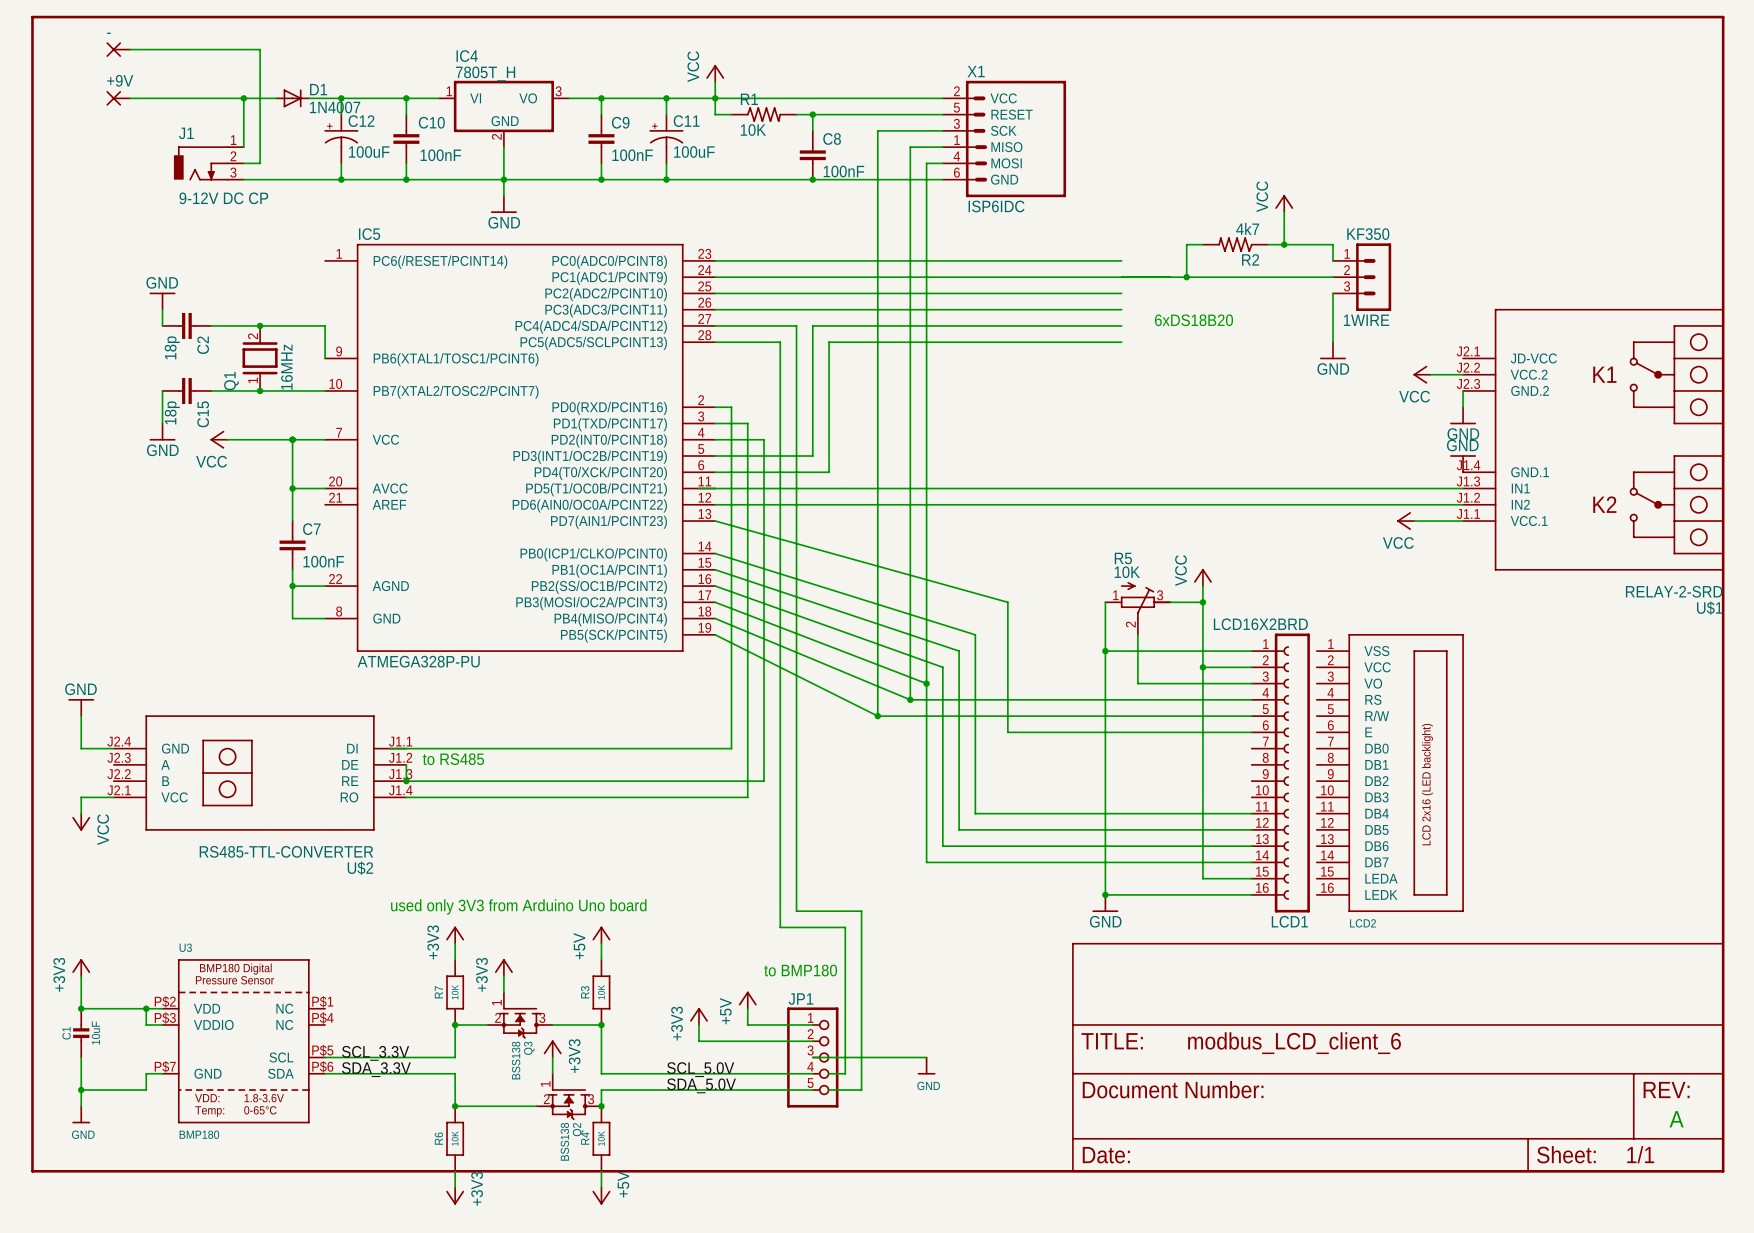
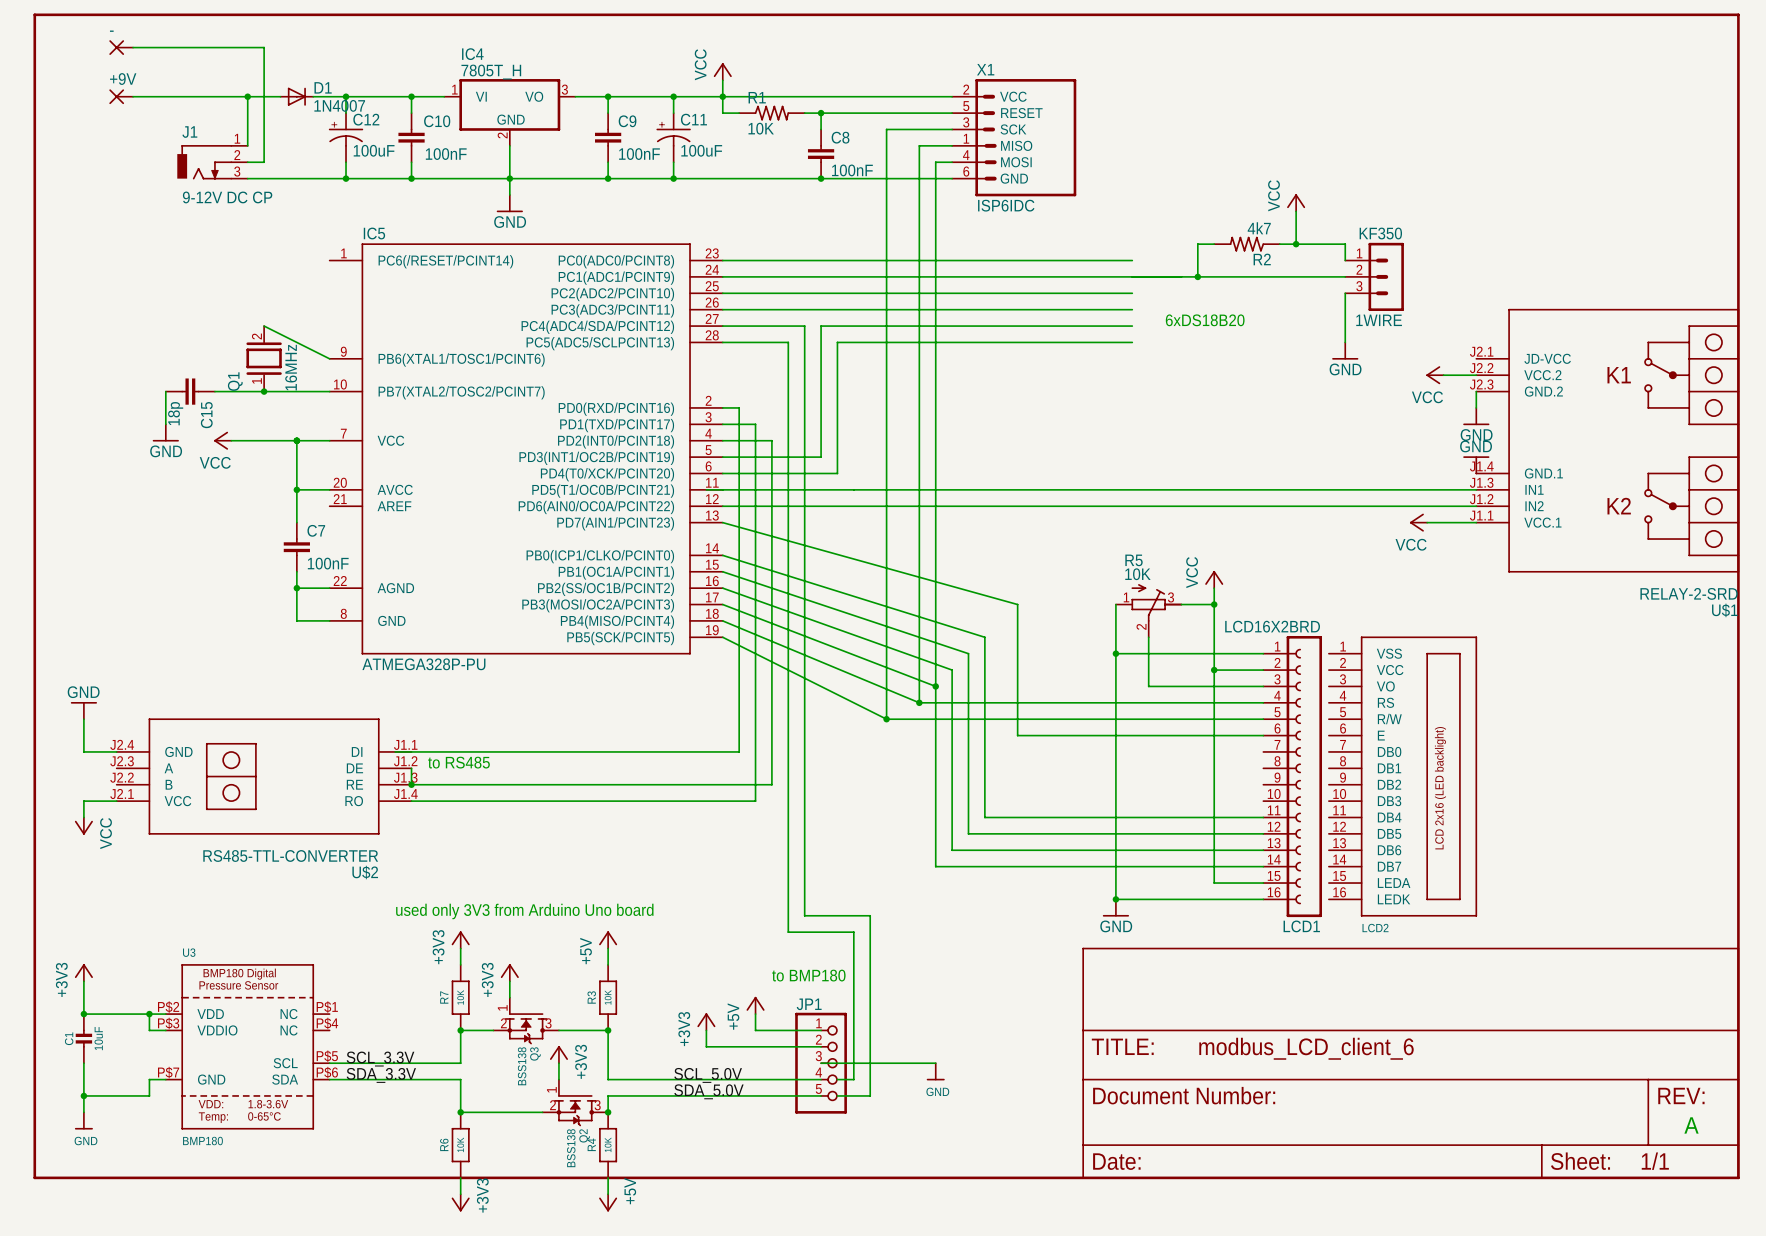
power symbol: GND (162, 301) -> none
wire: (162, 309) (162, 325) -> none
C2: 18p (186, 325) -> none
wire: (211, 325) (325, 325) (325, 358) -> (264, 326) (329, 358)
junction: (260, 325) -> none

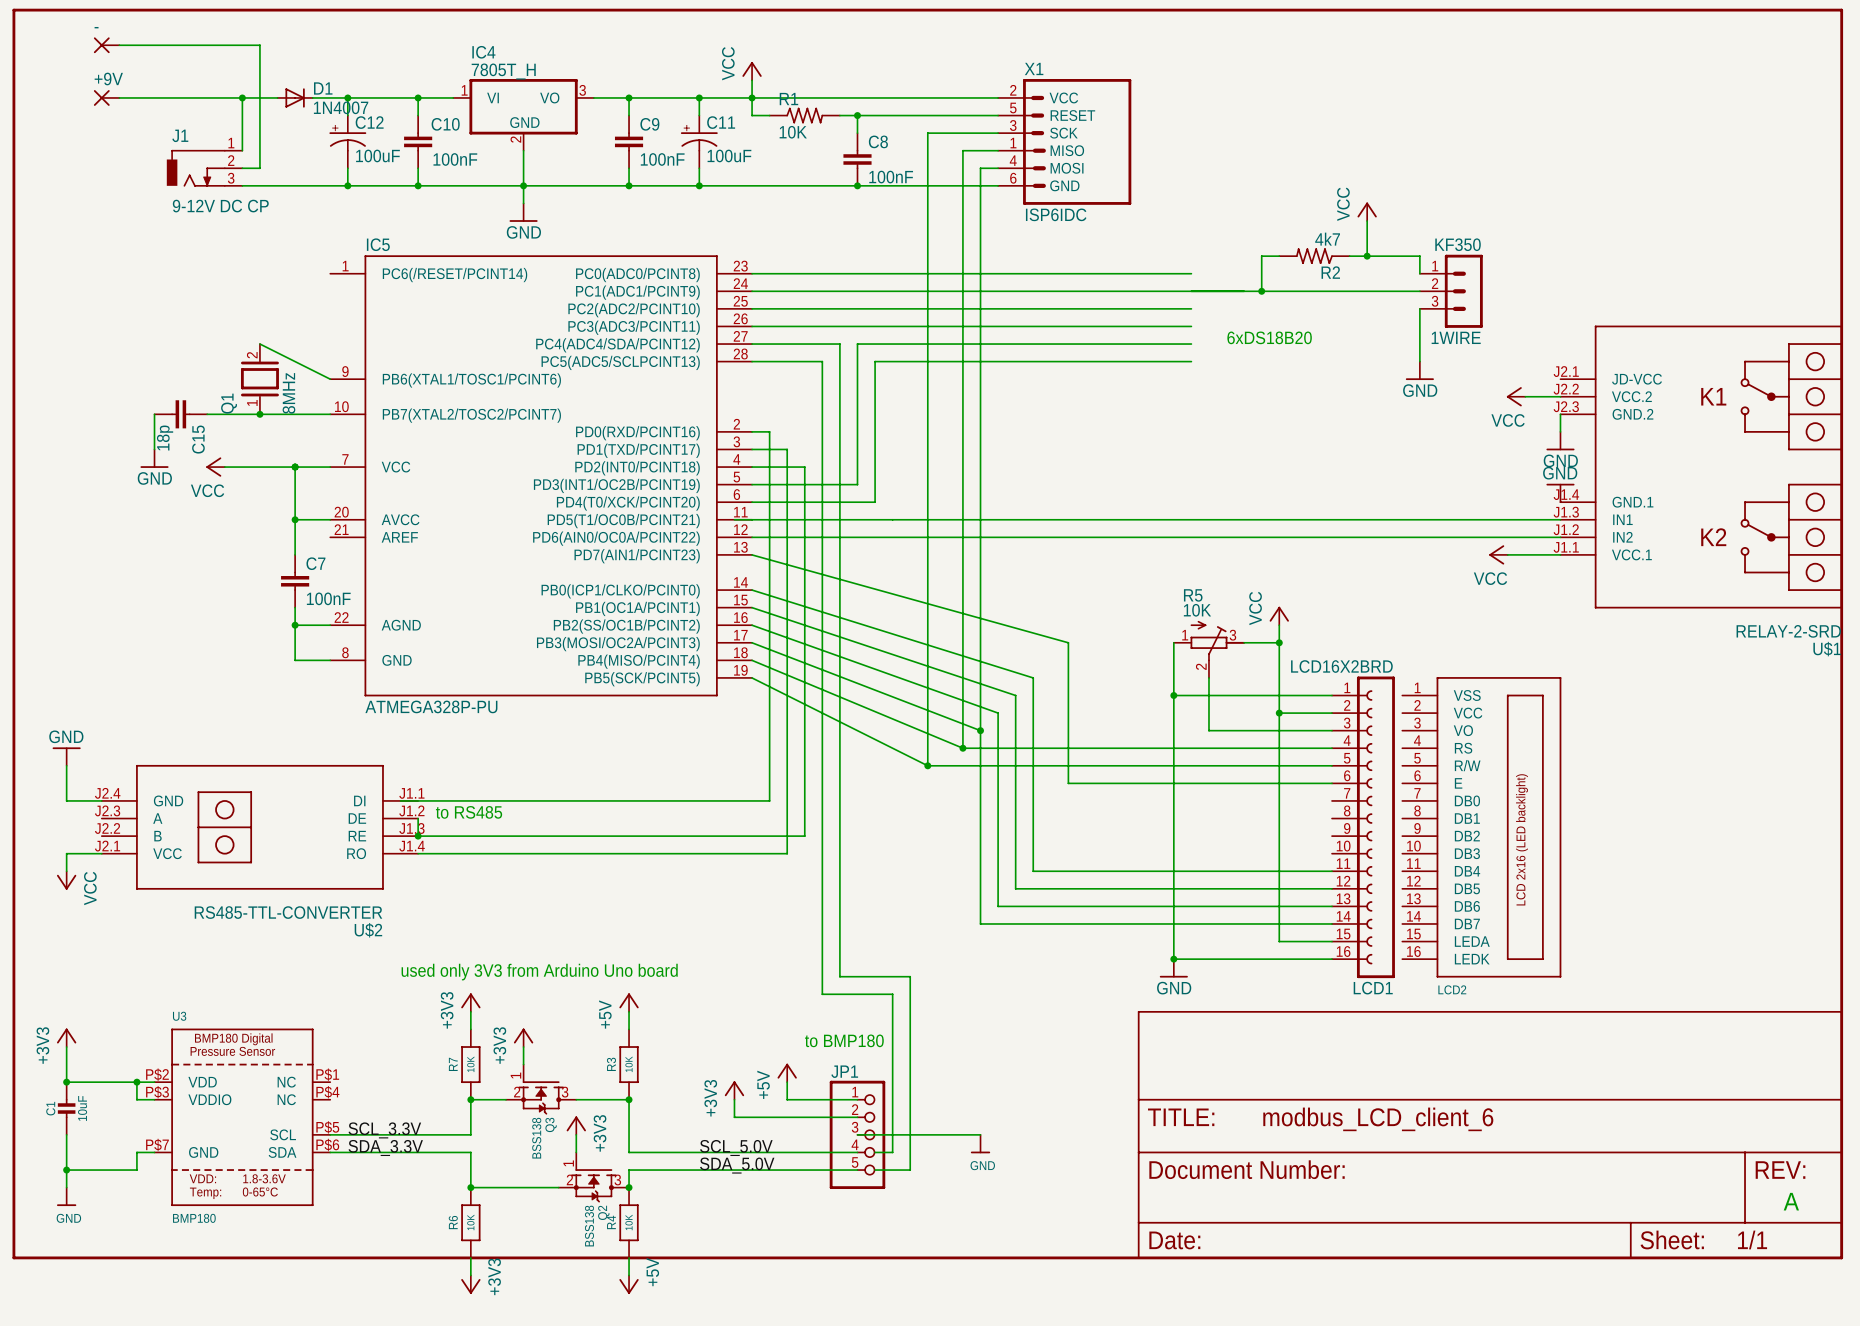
Q1 value: 16MHz (291, 367) -> 8MHz (288, 393)

